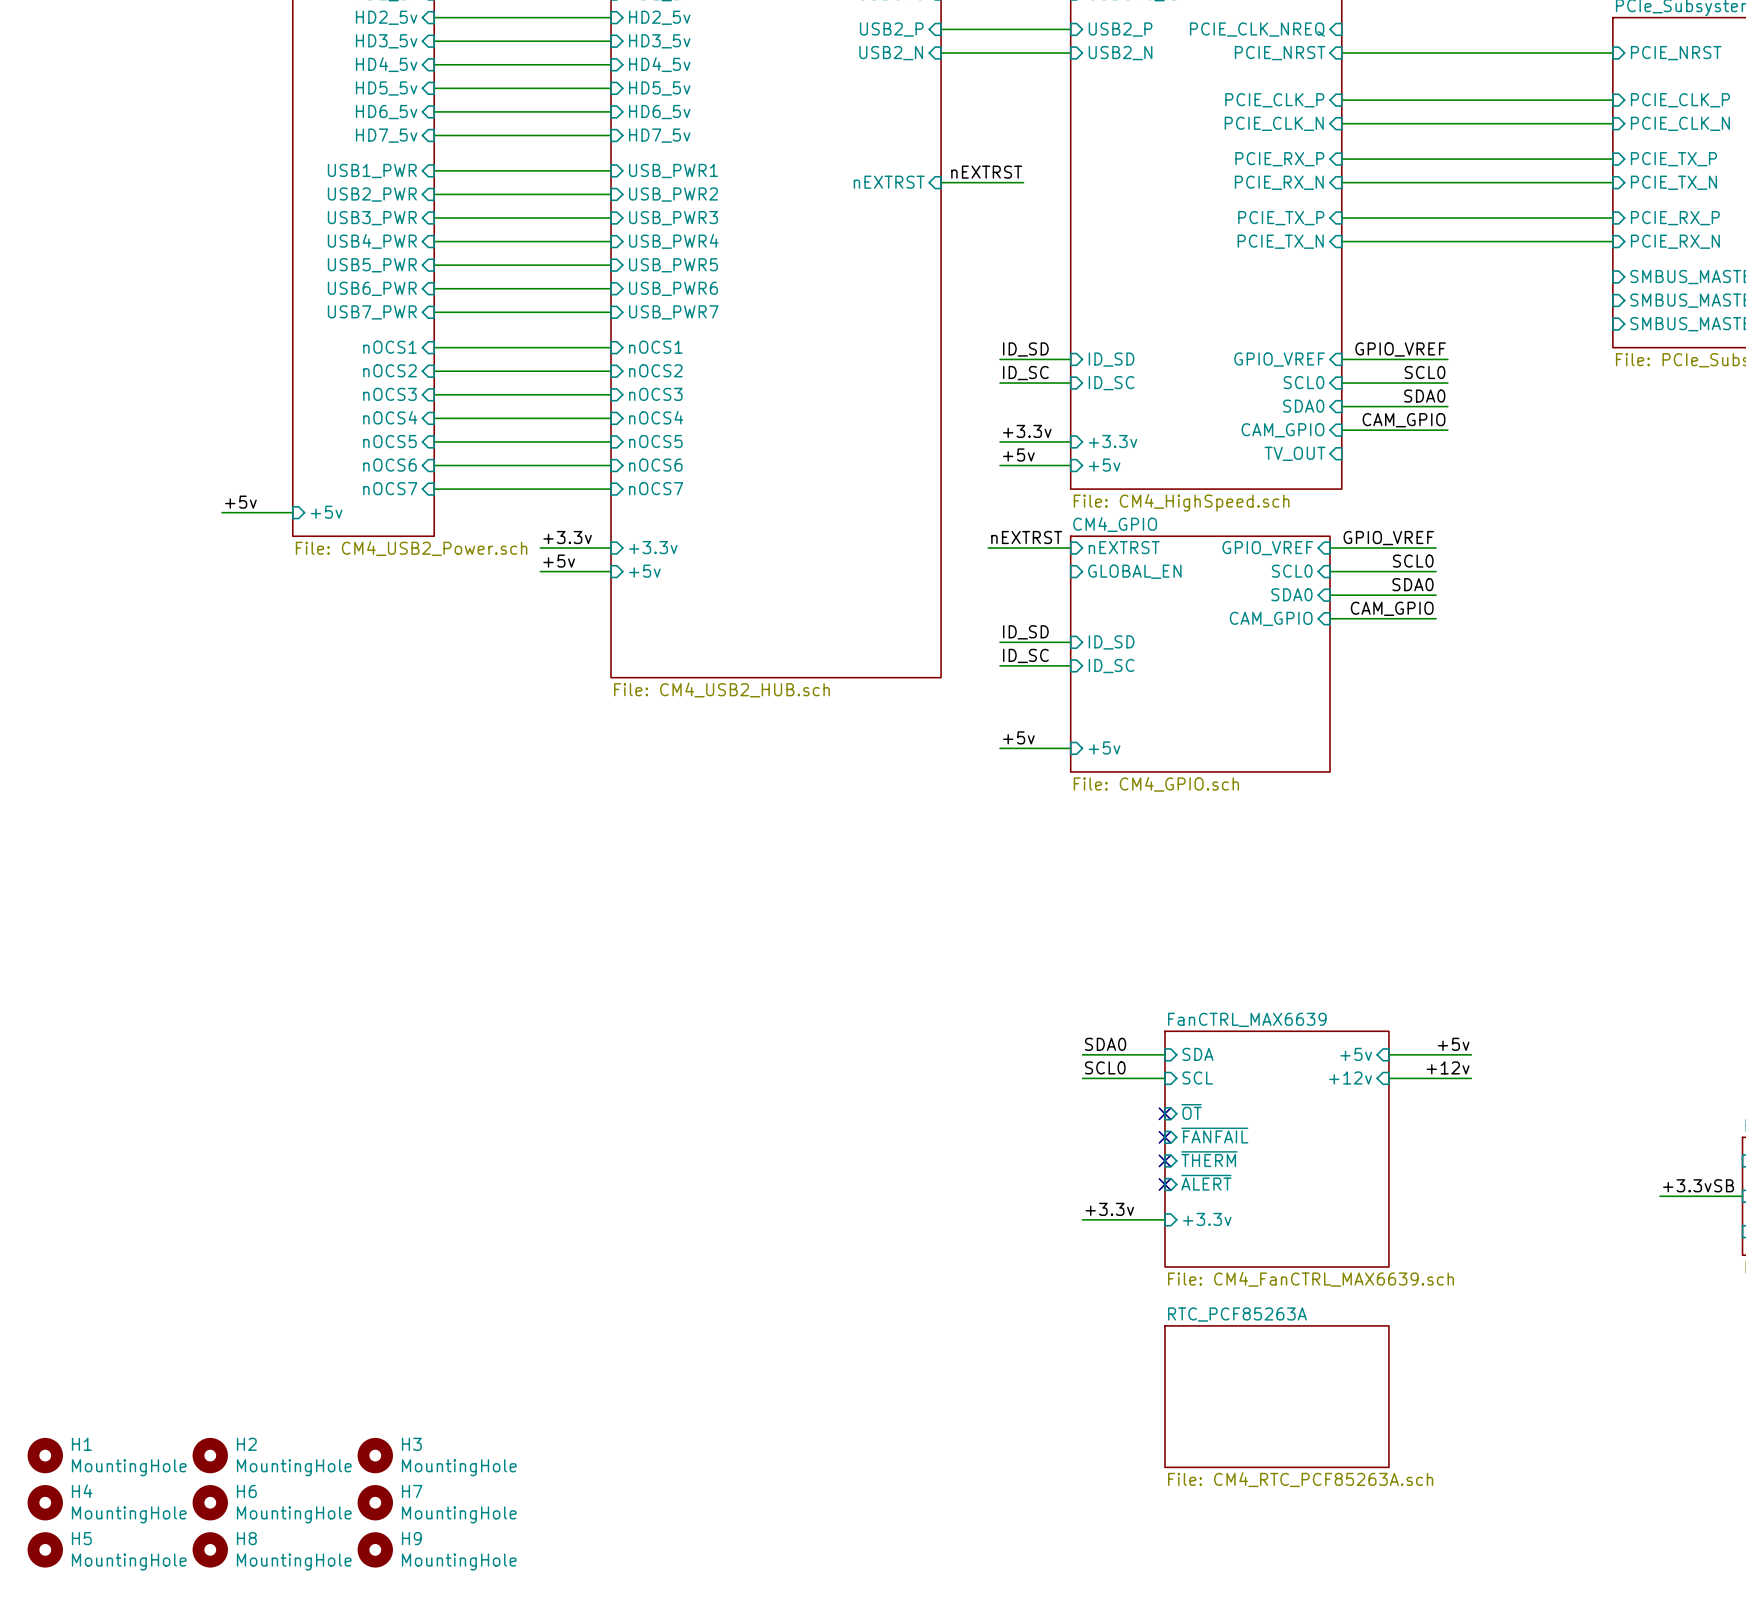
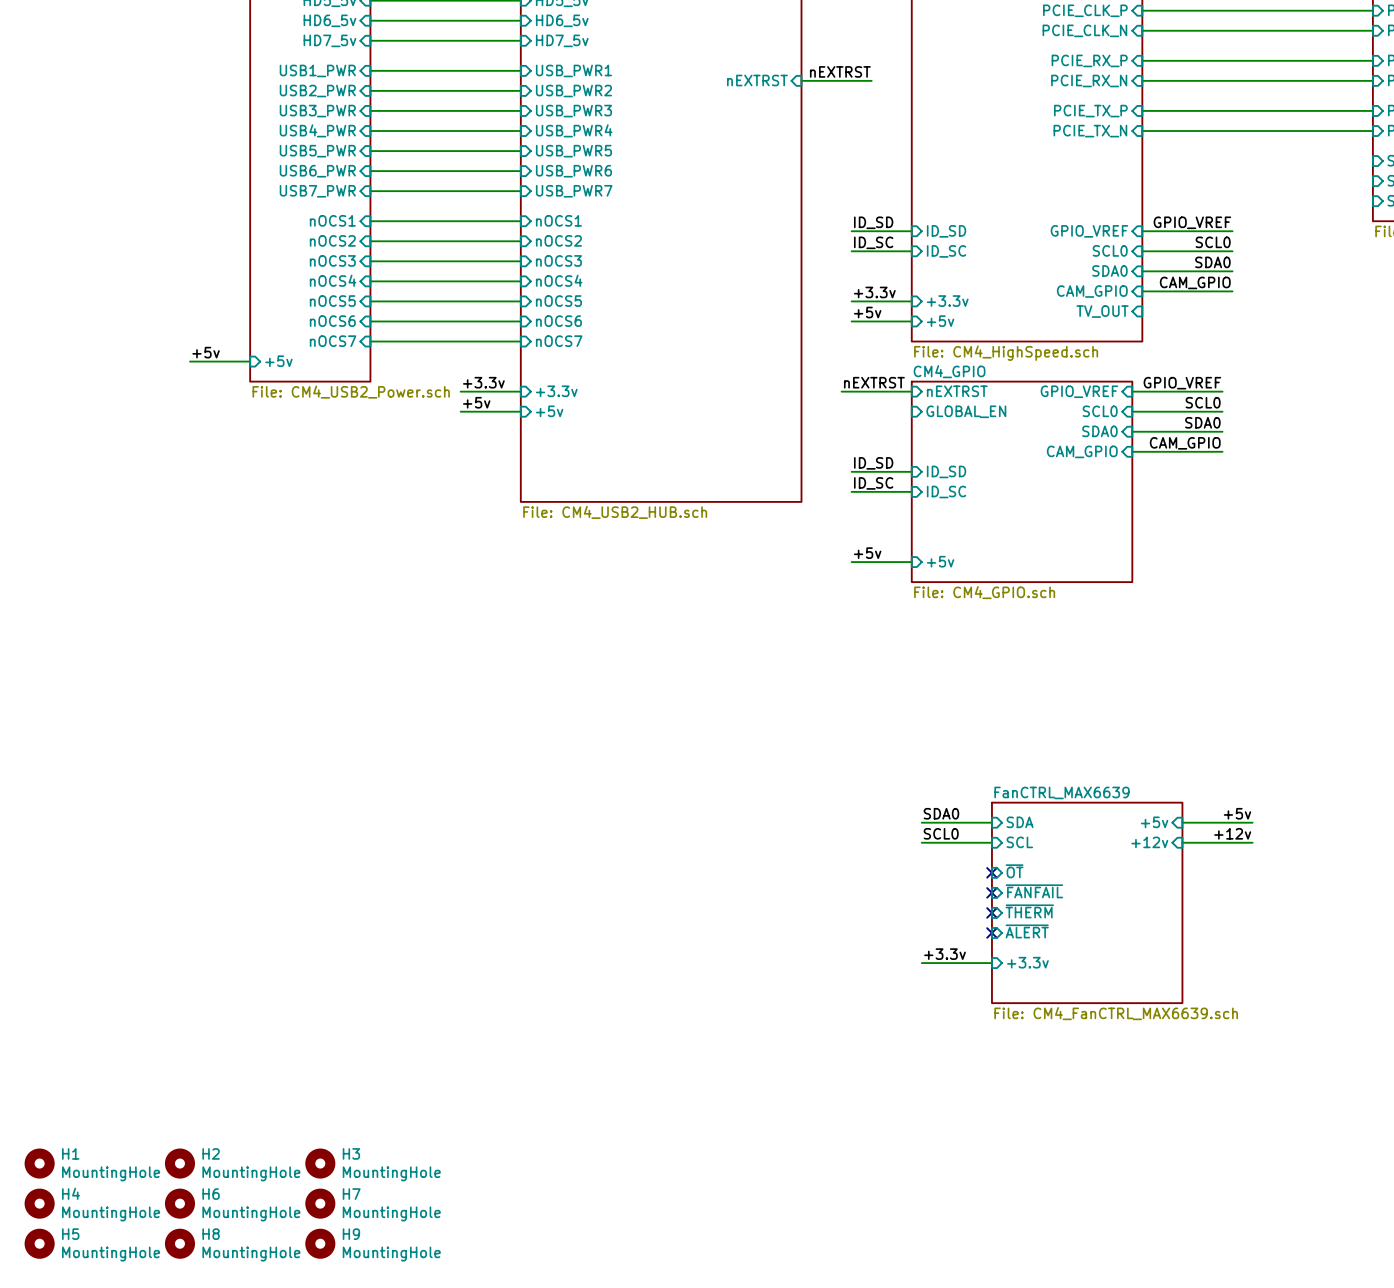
sheet RTC_PCF85263A: File: CM4_RTC_PCF85263A.sch (1276, 1396) -> none

